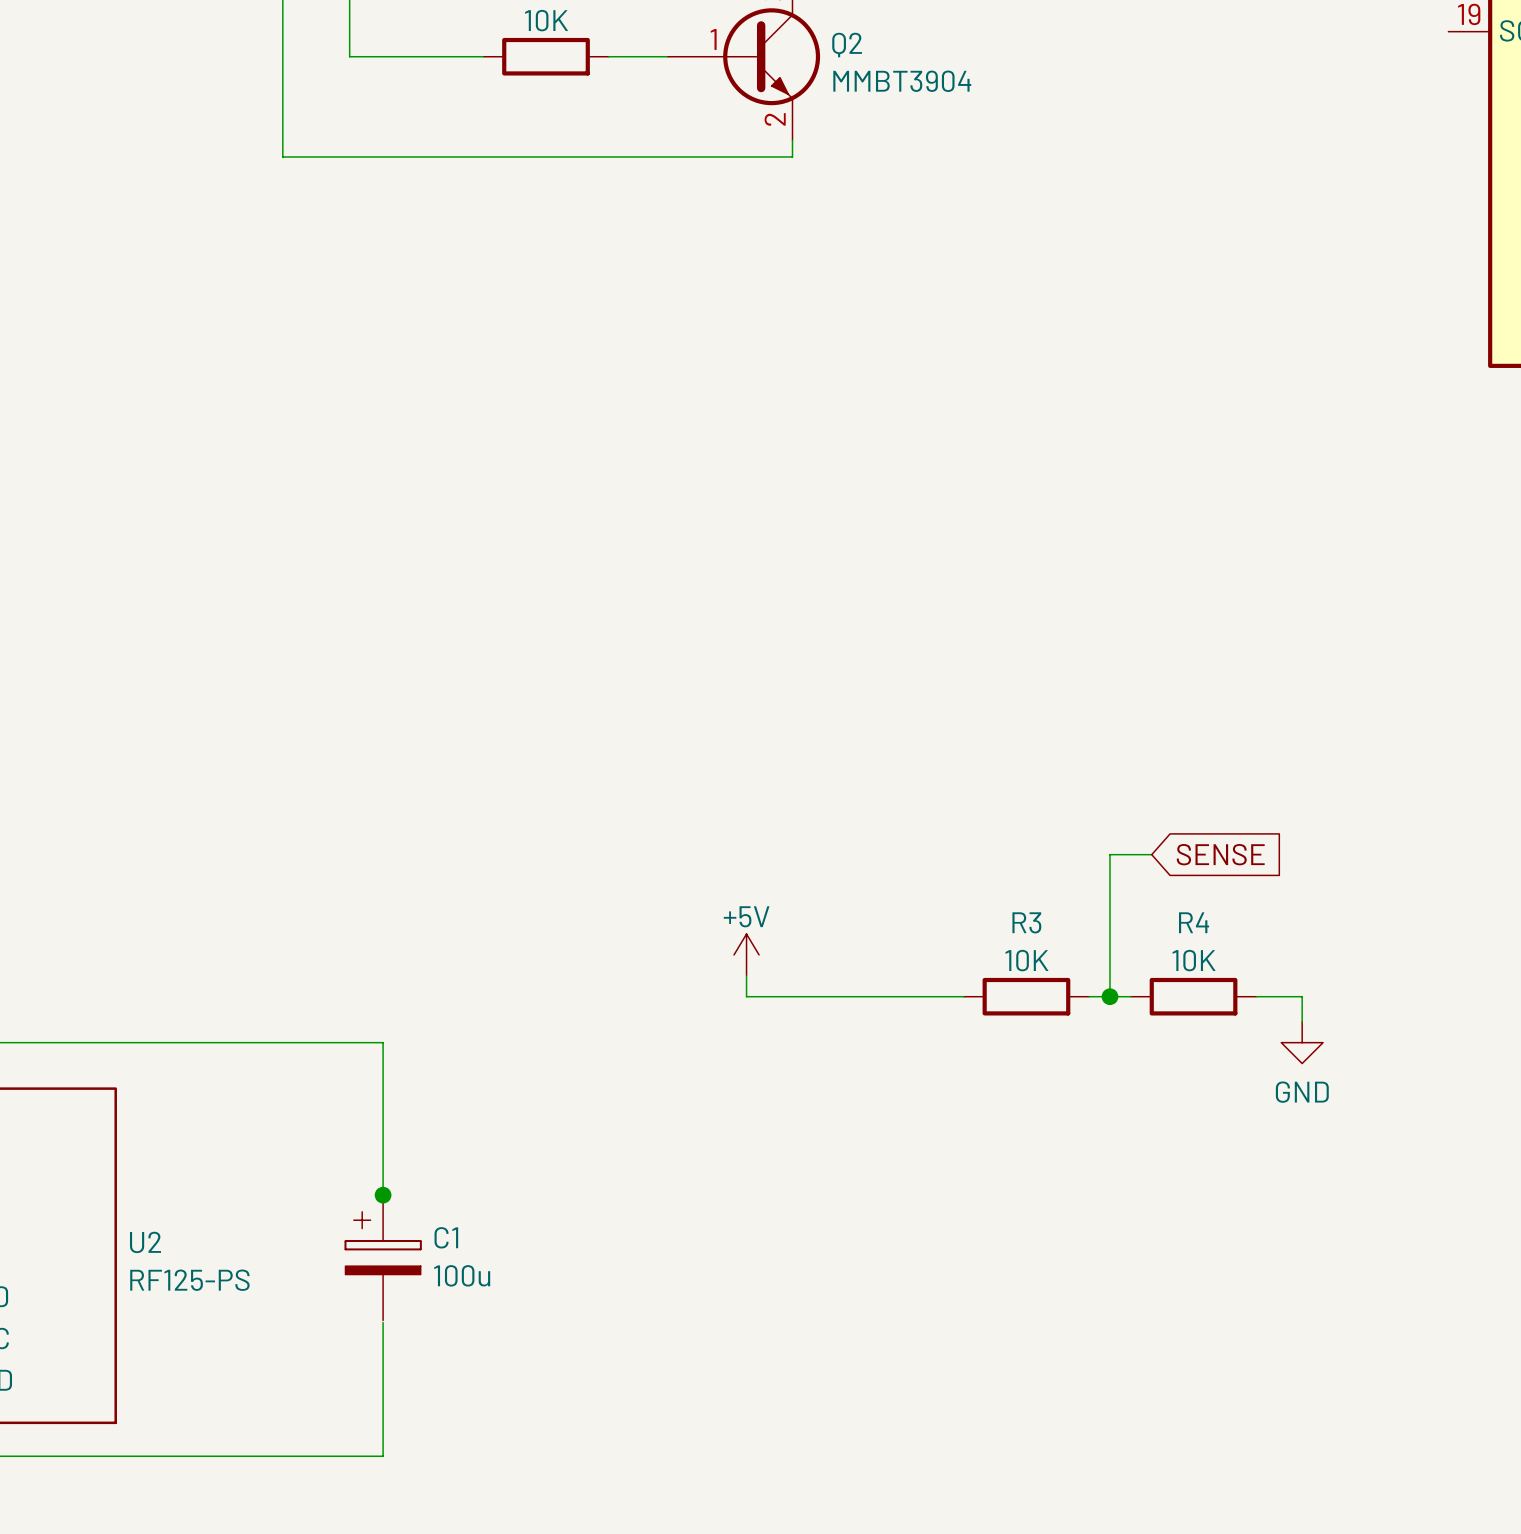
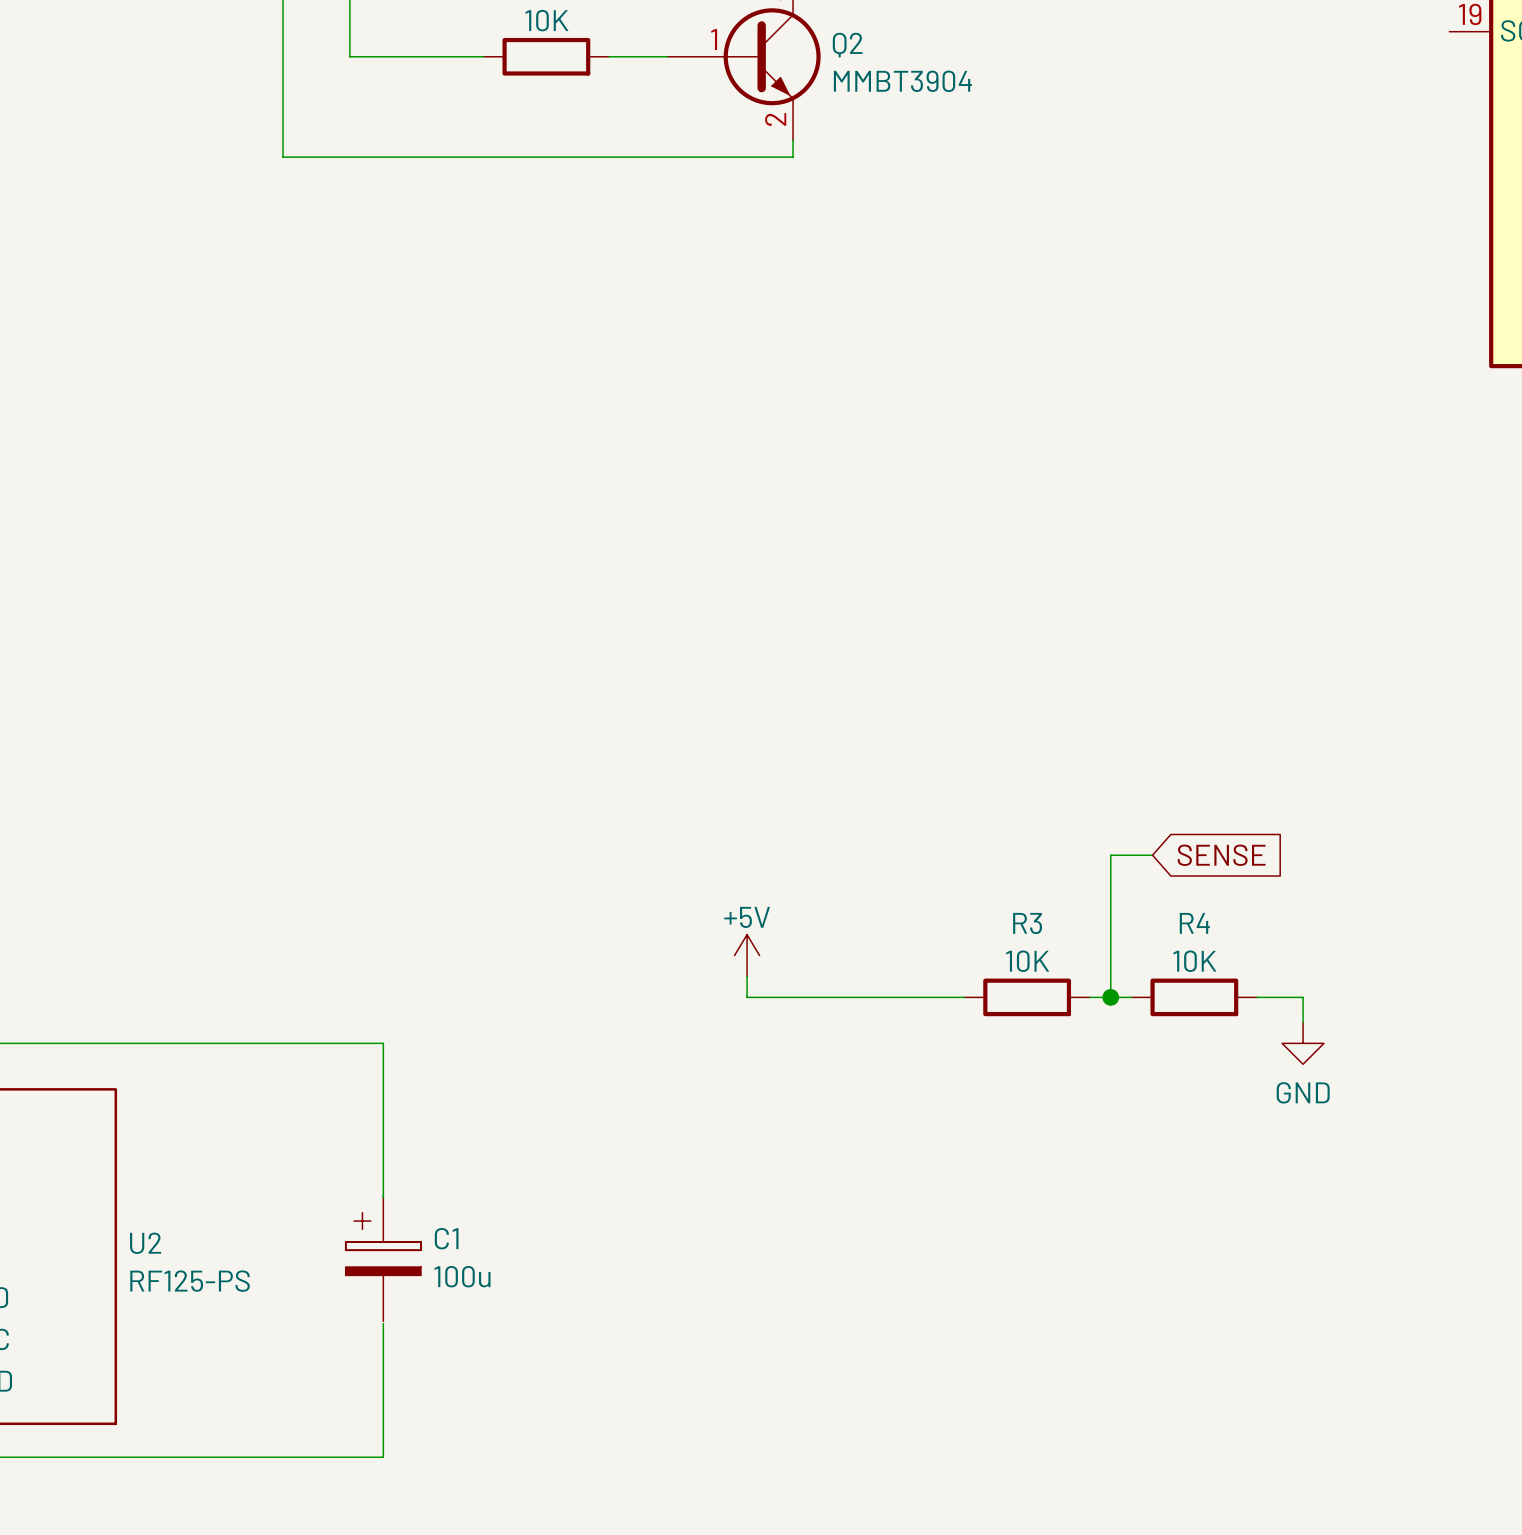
junction: (383, 1195) -> none

